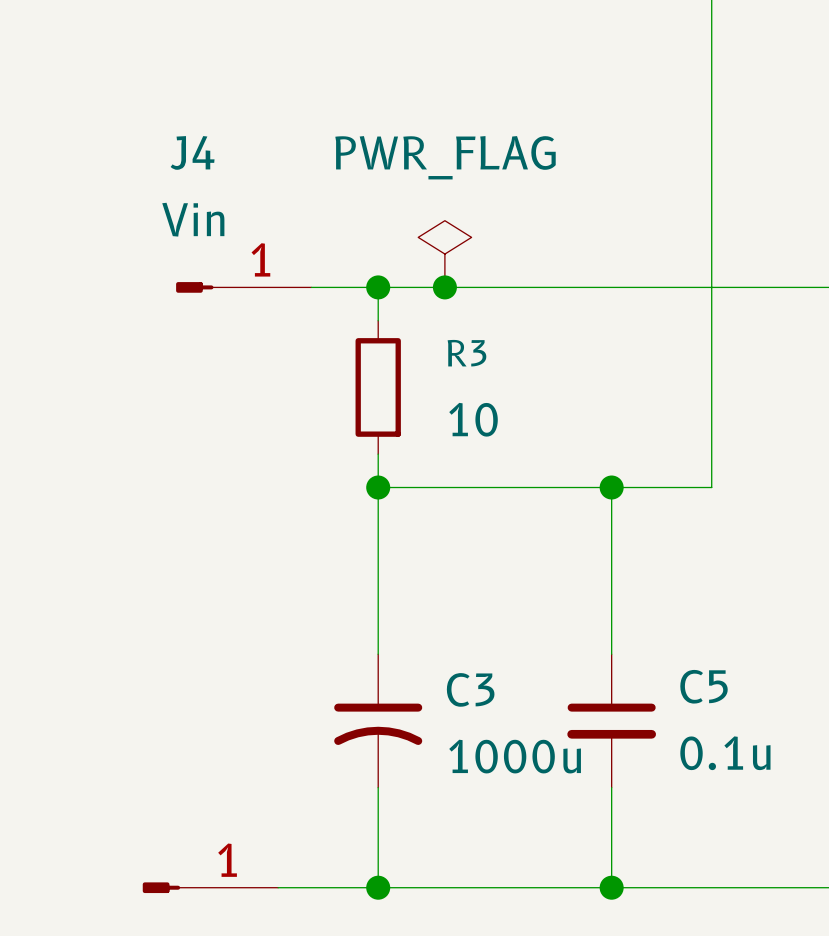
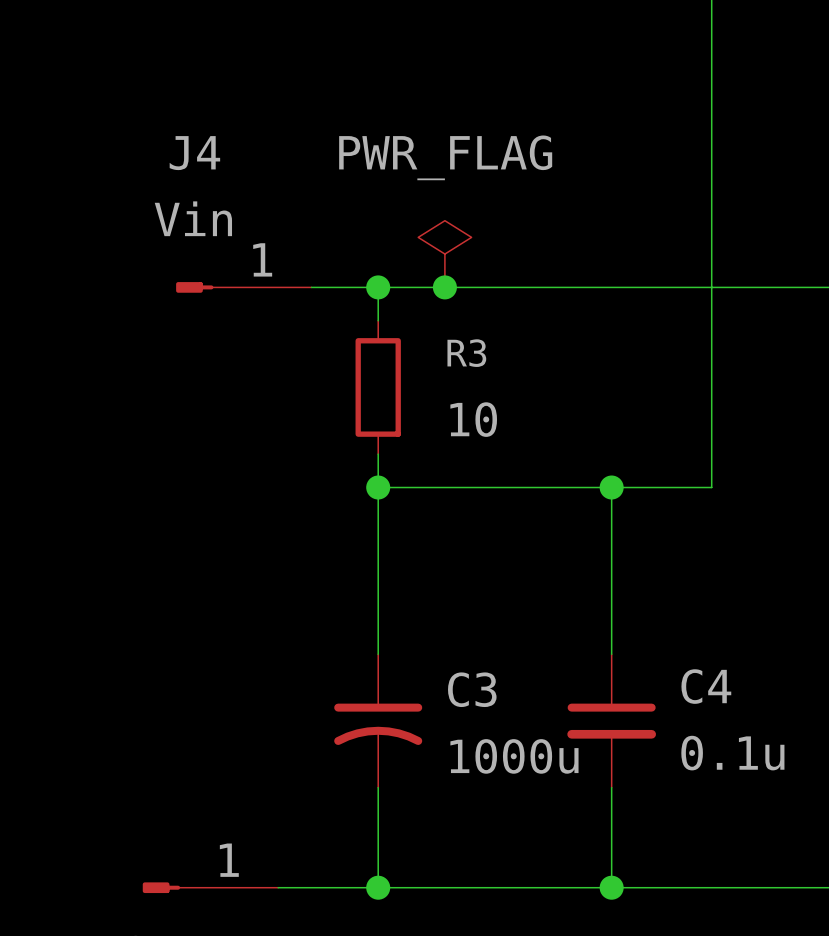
C5 name: C5 (704, 686) -> C4 (706, 686)

